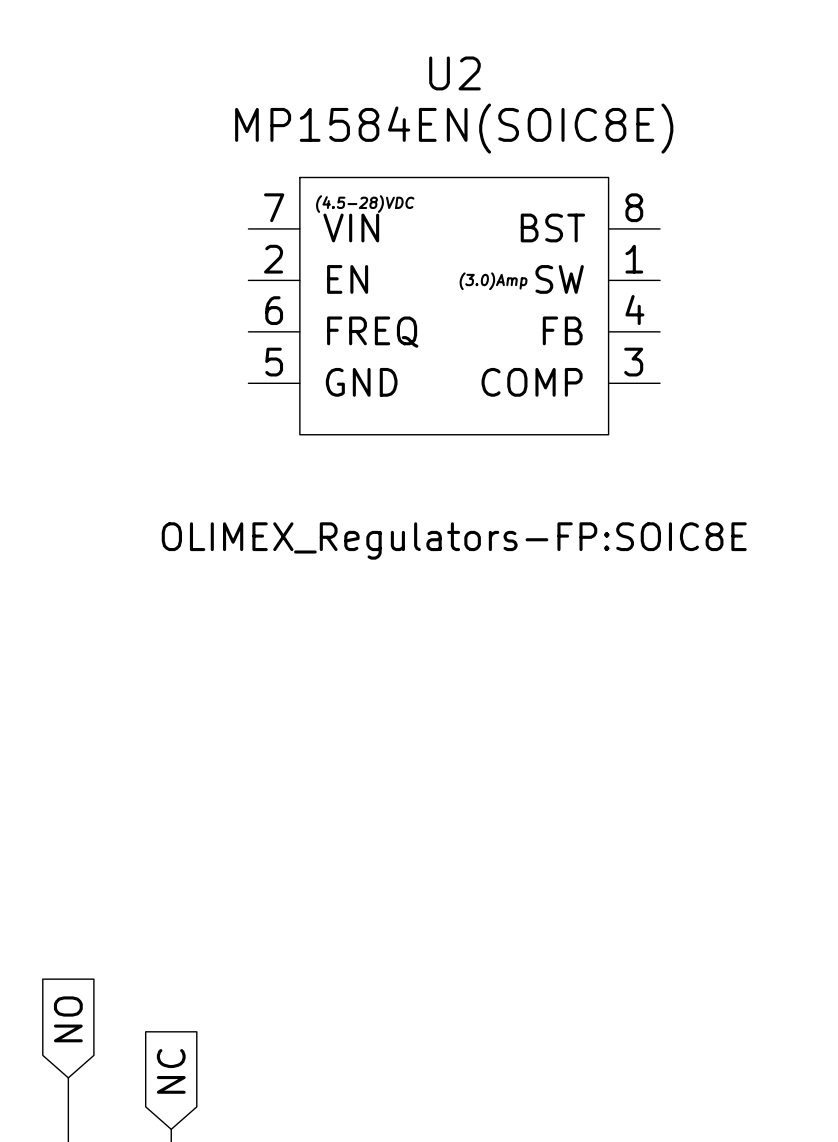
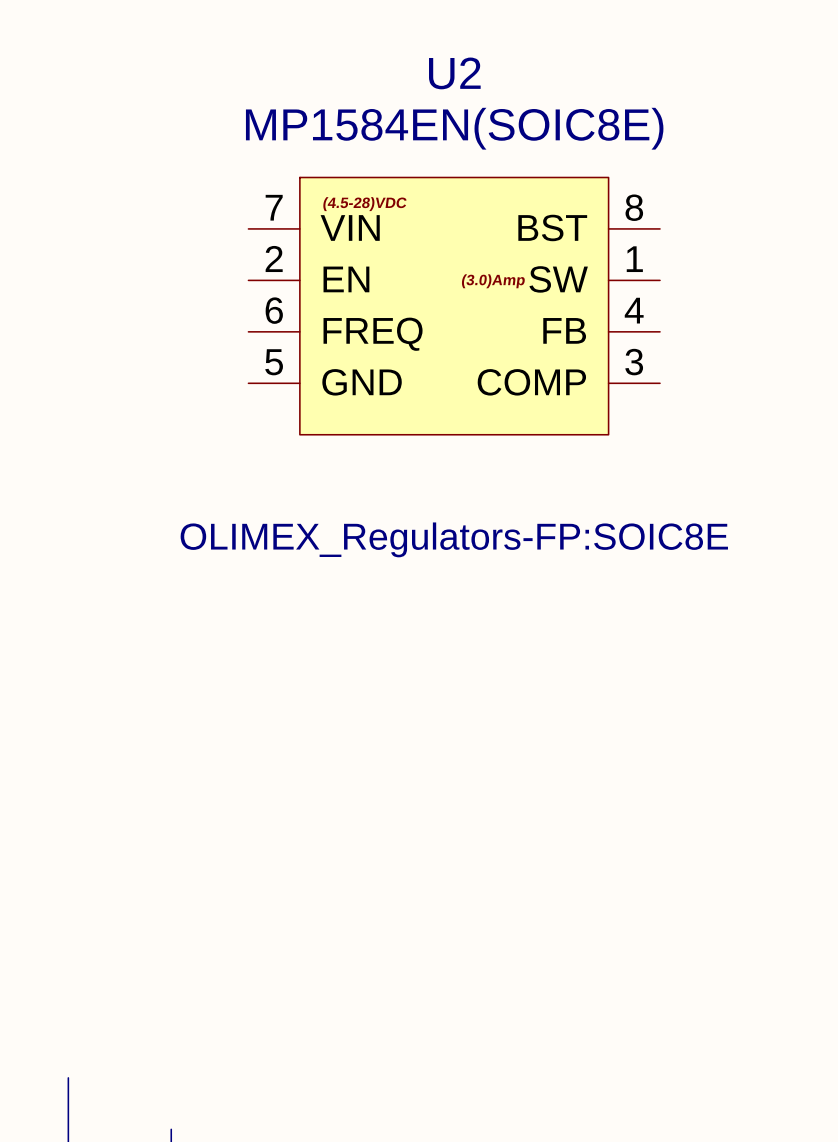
global label: NO (68, 1019) -> none
global label: NC (171, 1071) -> none

